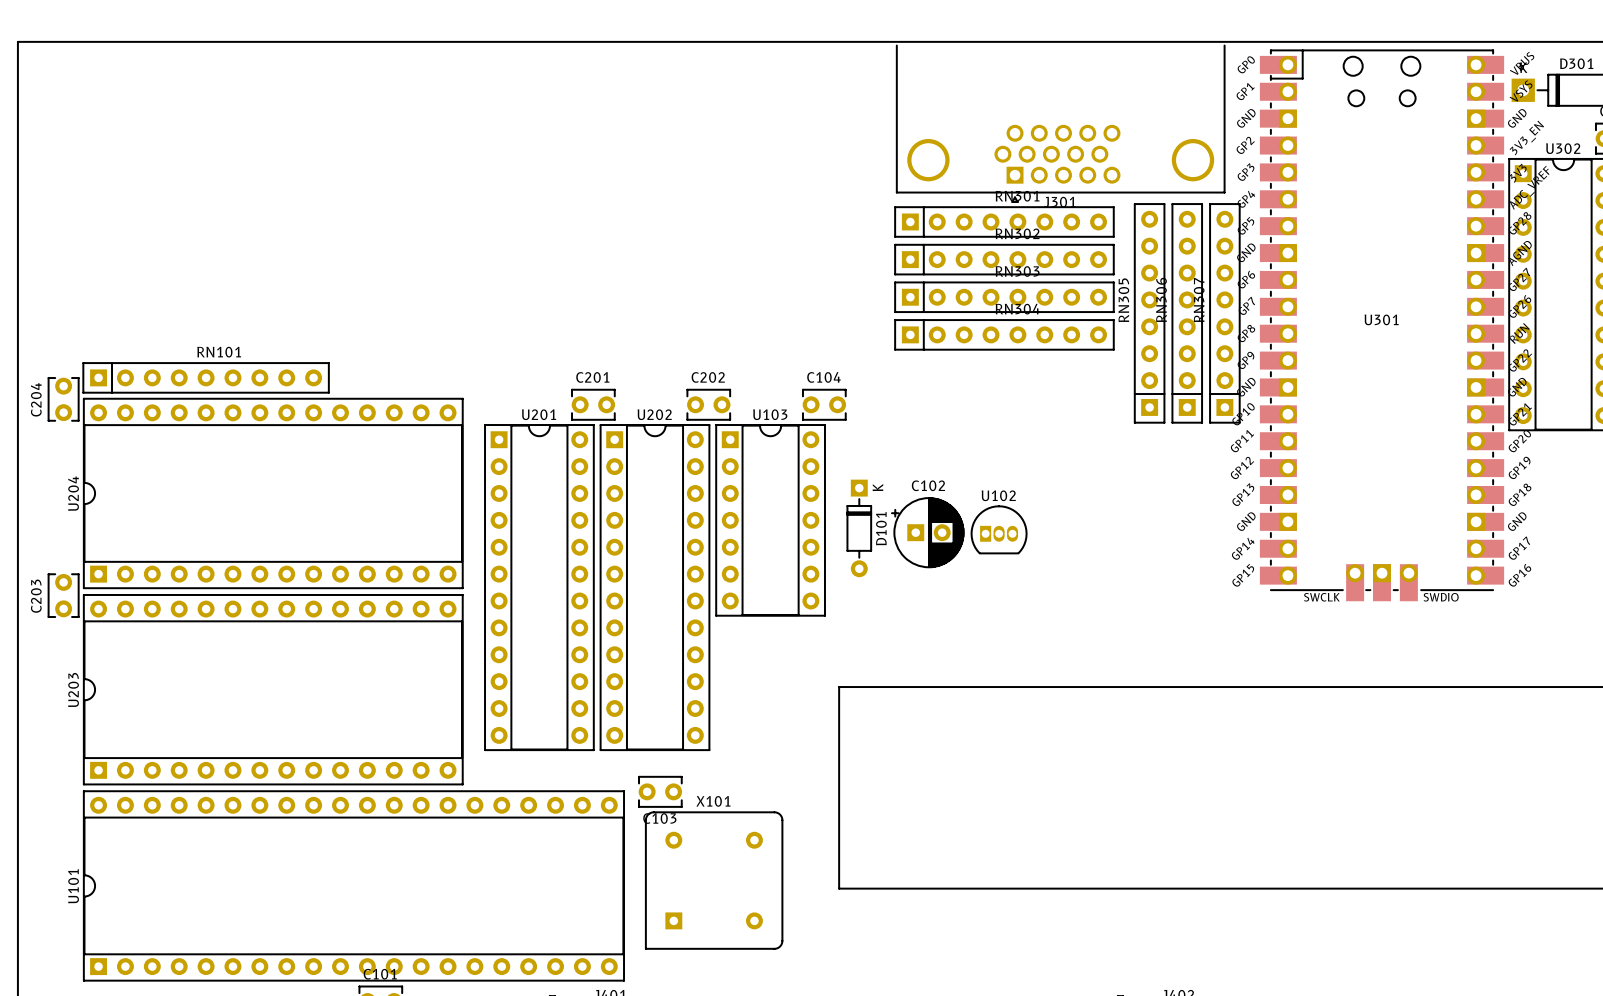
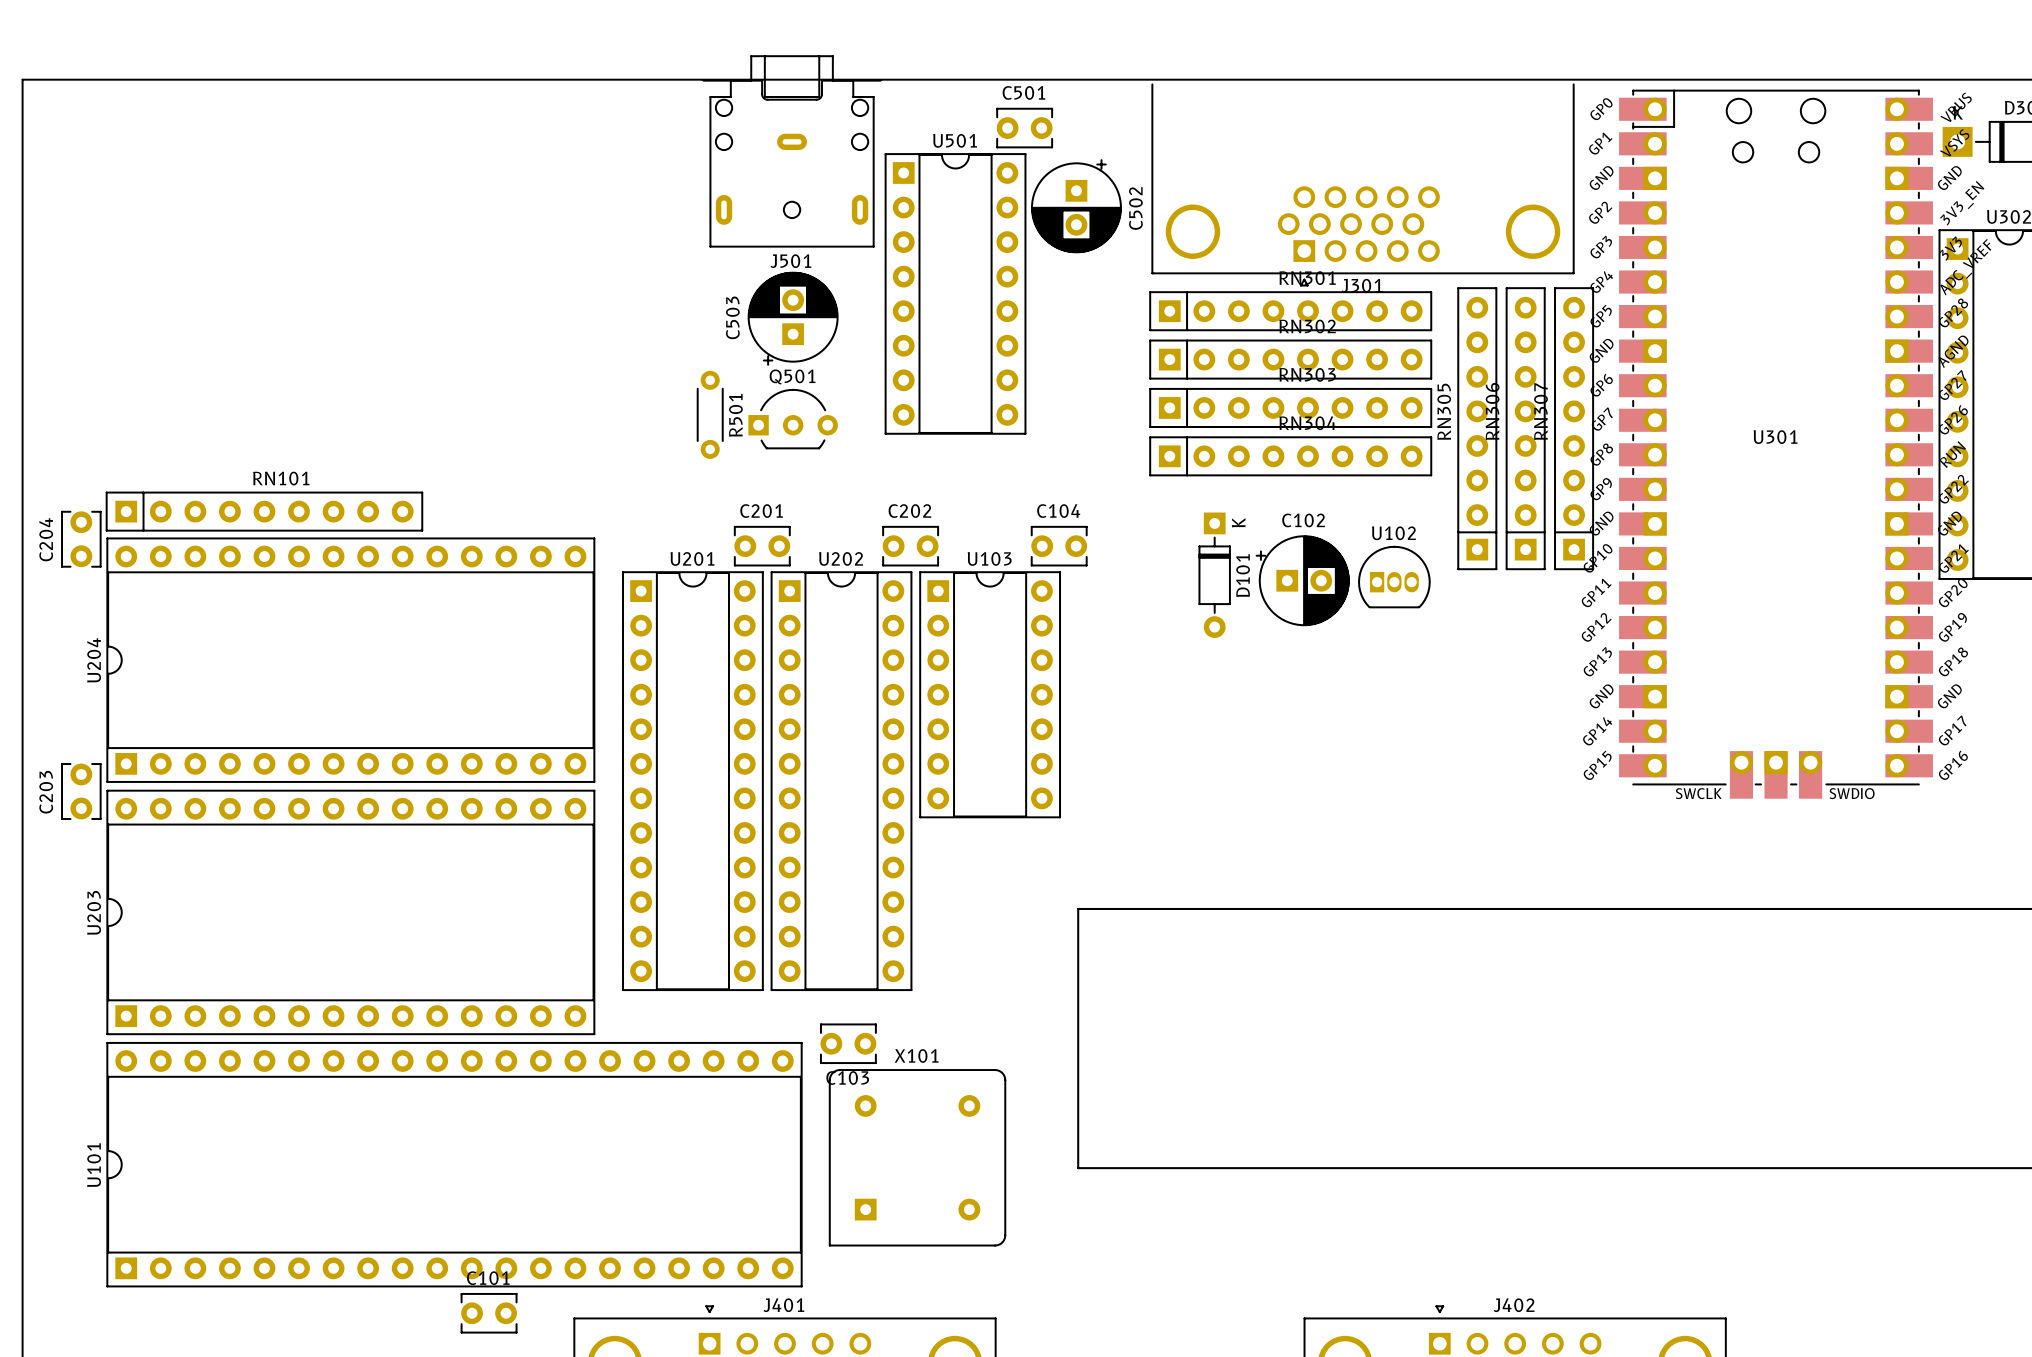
C501: none -> (1024, 128)
J501: none -> (792, 151)
C502: none -> (1076, 206)
U501: none -> (955, 293)
C503: none -> (793, 318)
R501: none -> (710, 414)
Q501: none -> (793, 419)
D101 position: (859, 528) -> (1214, 575)
U102 position: (999, 529) -> (1394, 577)
C102 position: (927, 532) -> (1302, 580)

